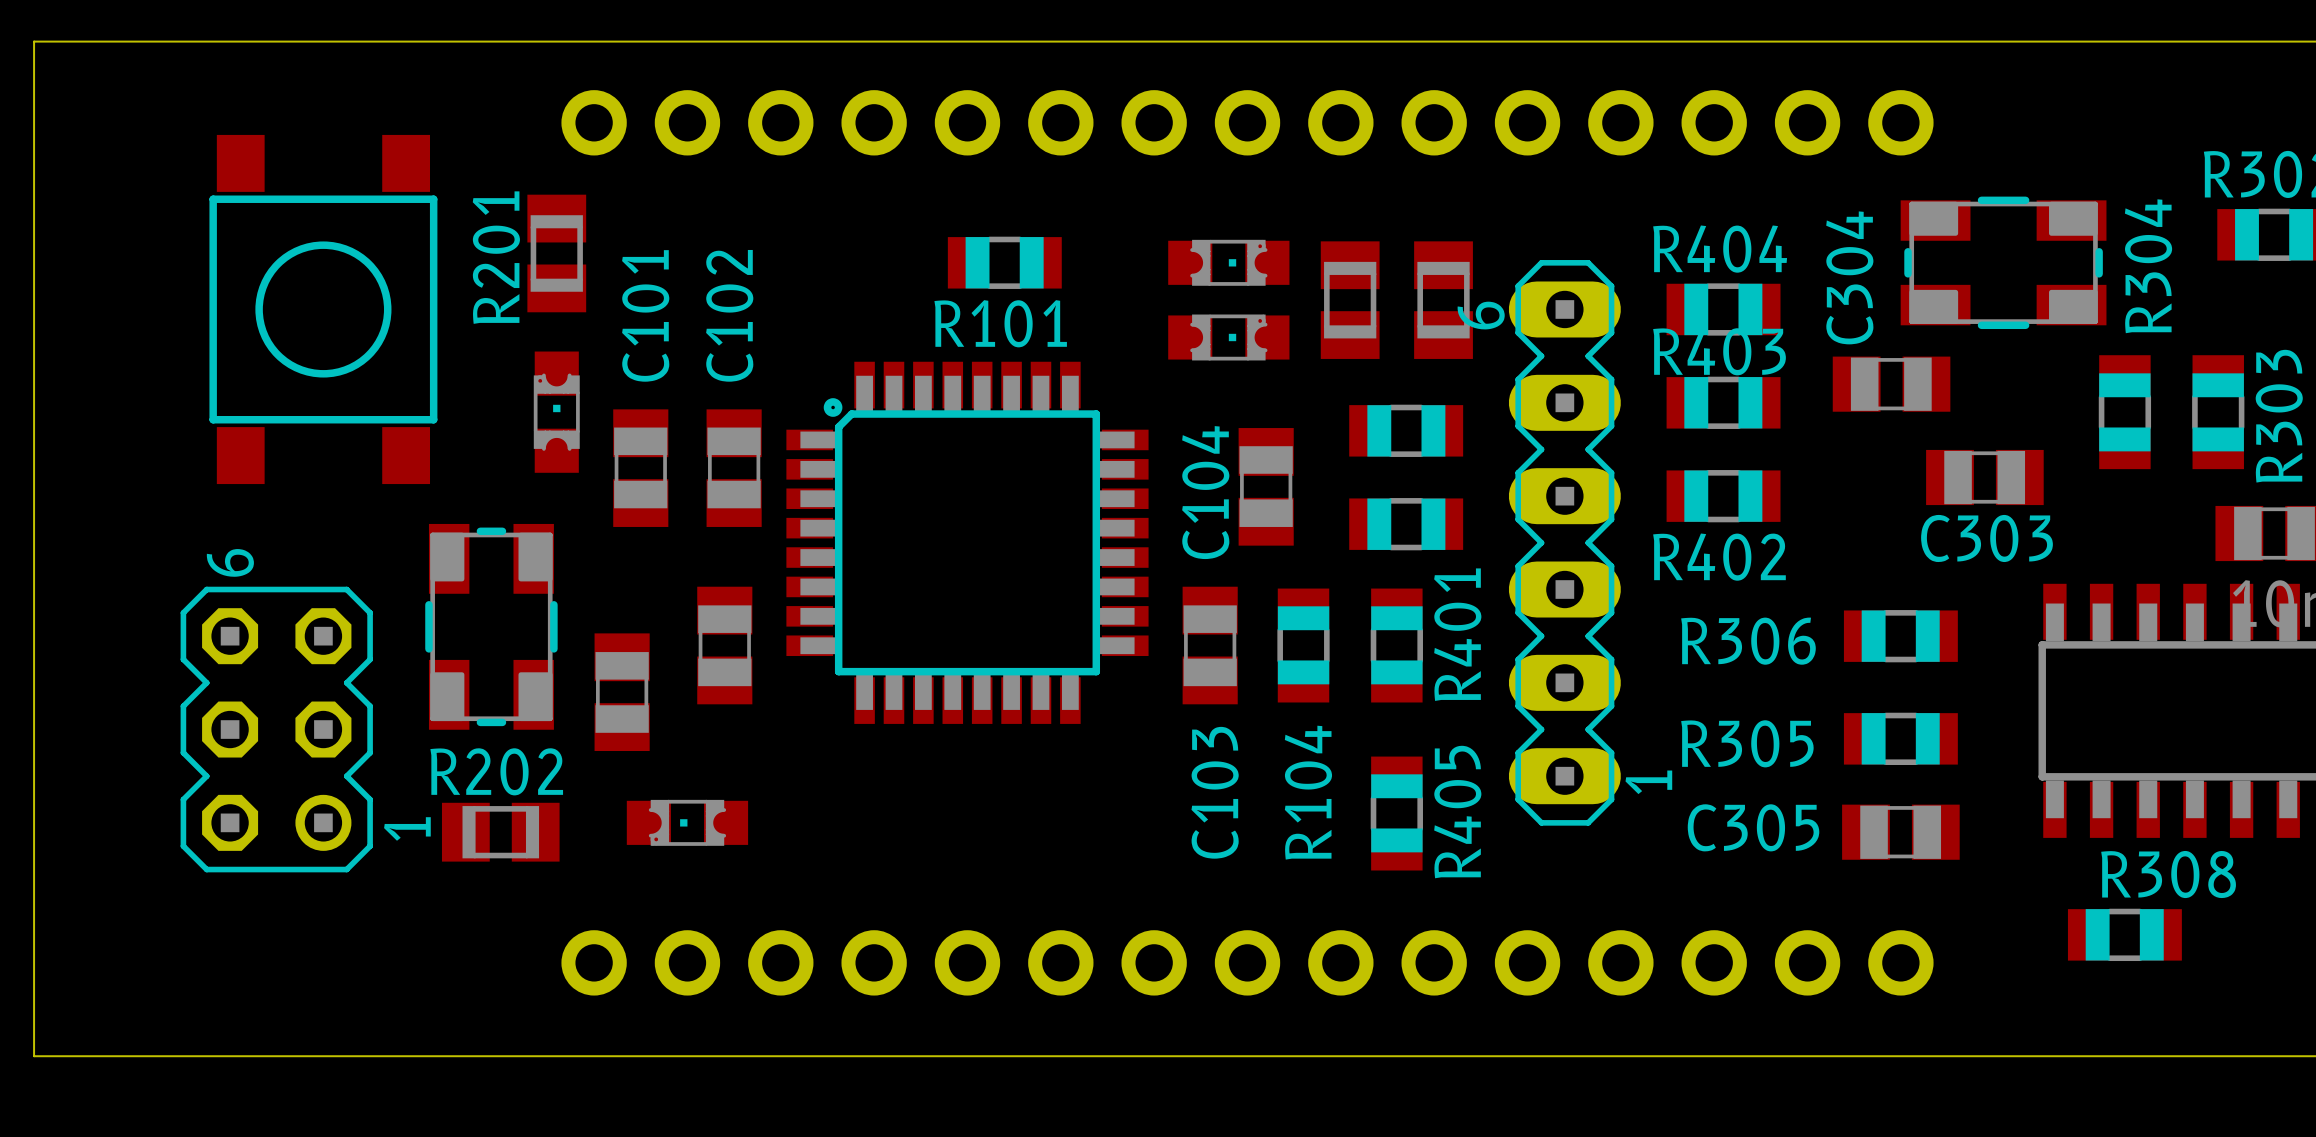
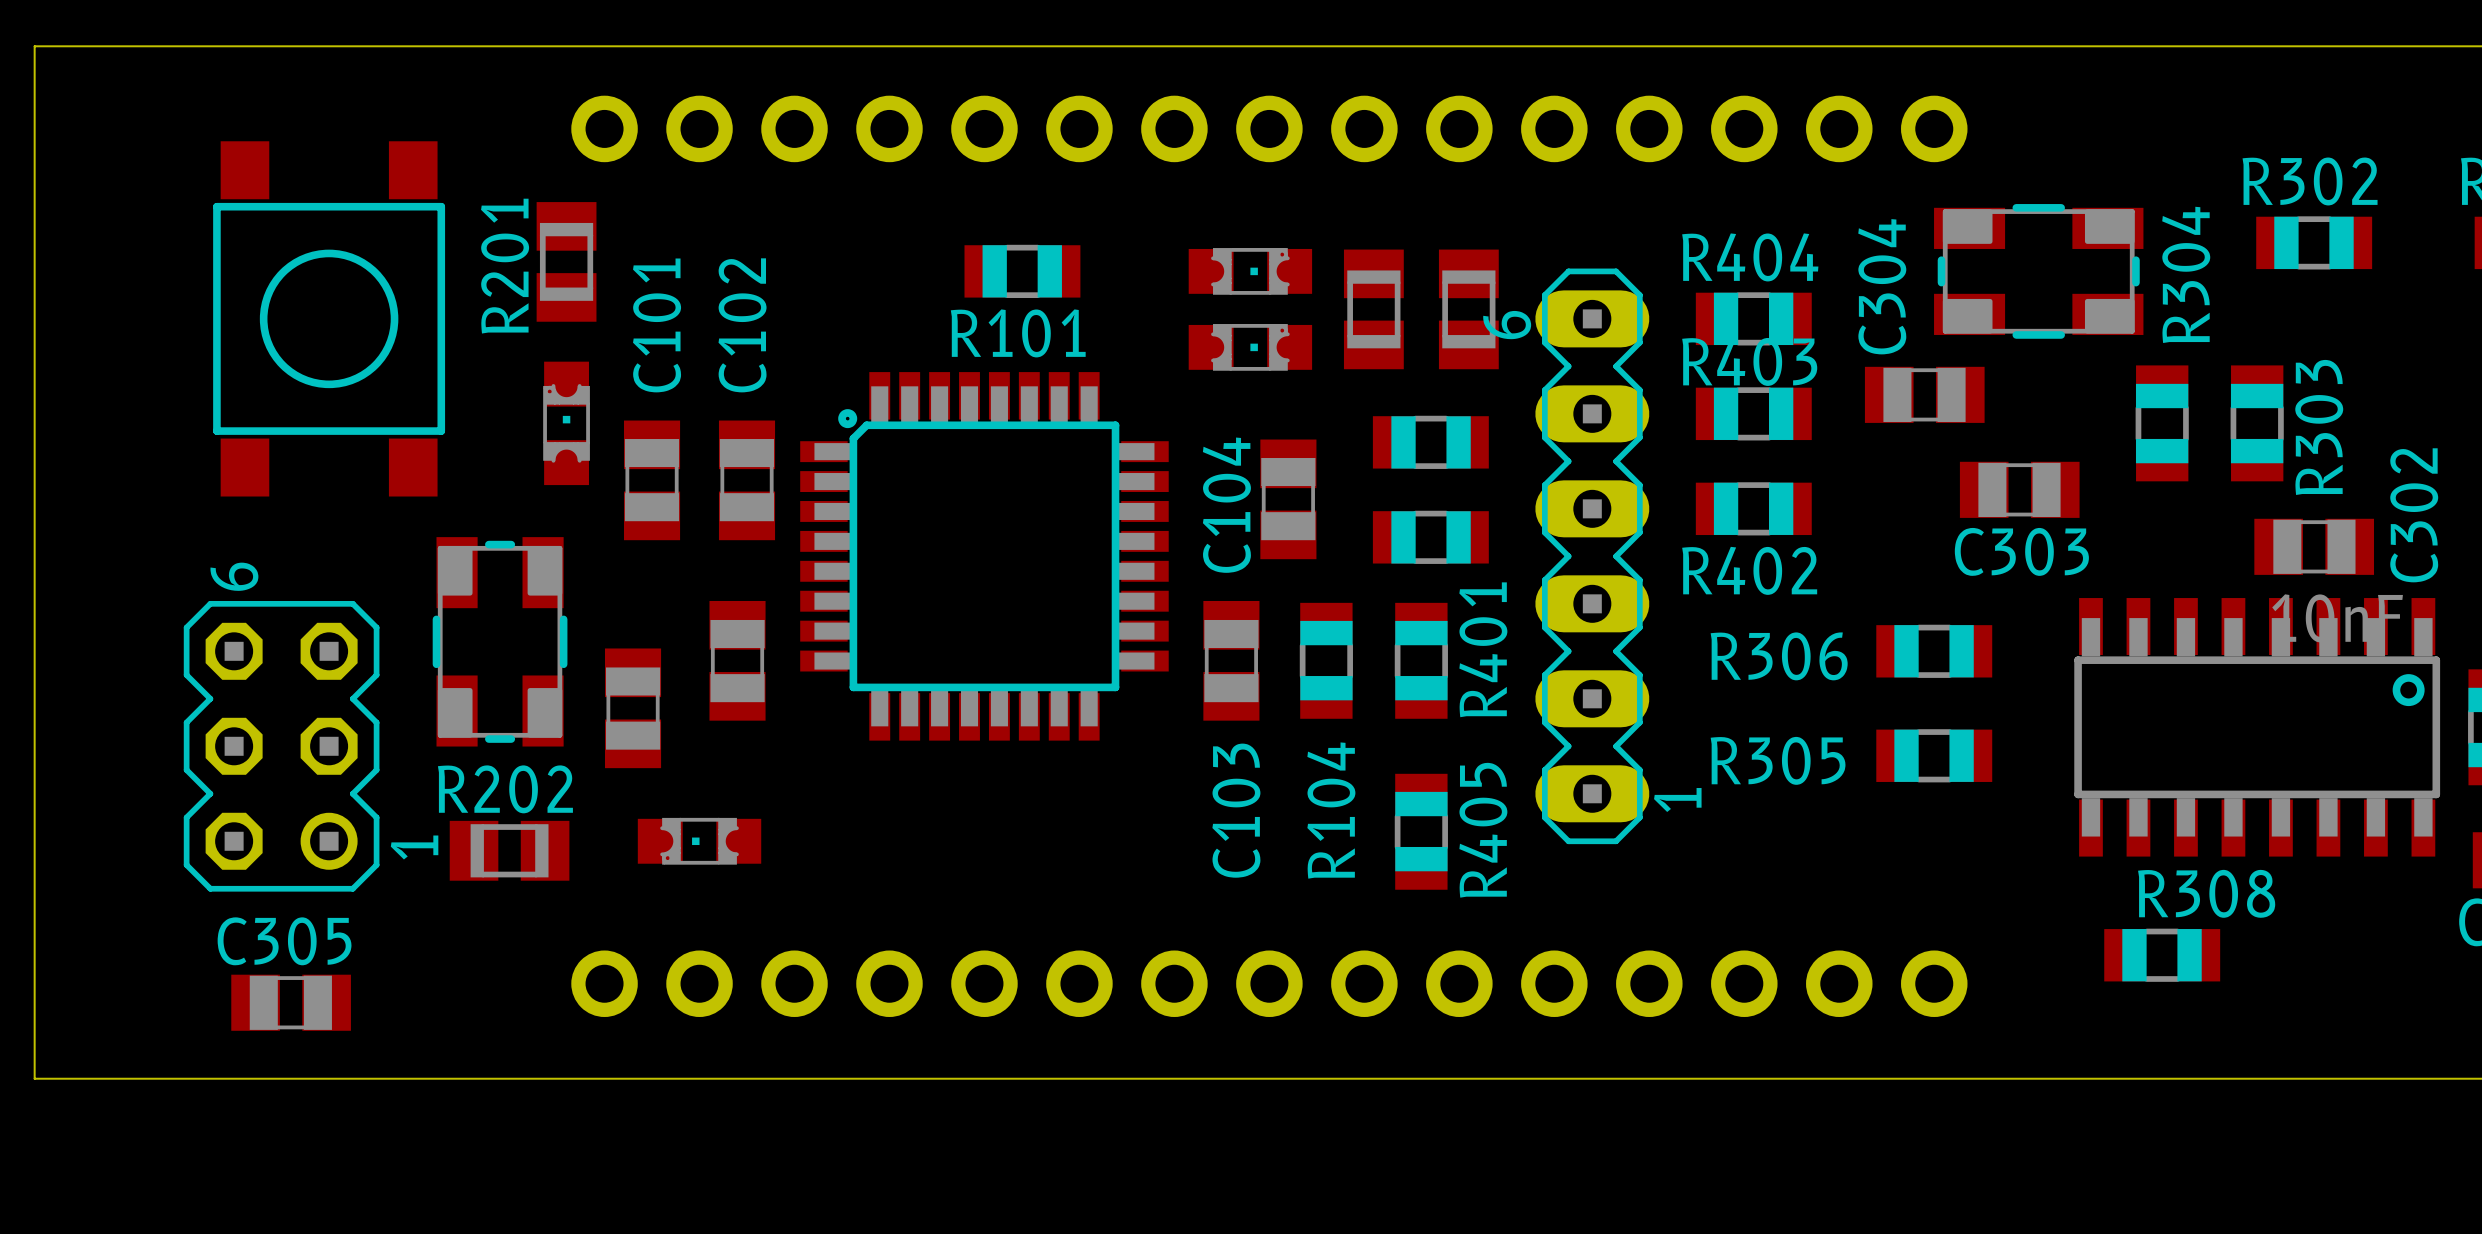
C305 name position: C305 (1753, 827) -> C305 (284, 941)
C305 position: (1900, 832) -> (291, 1002)

